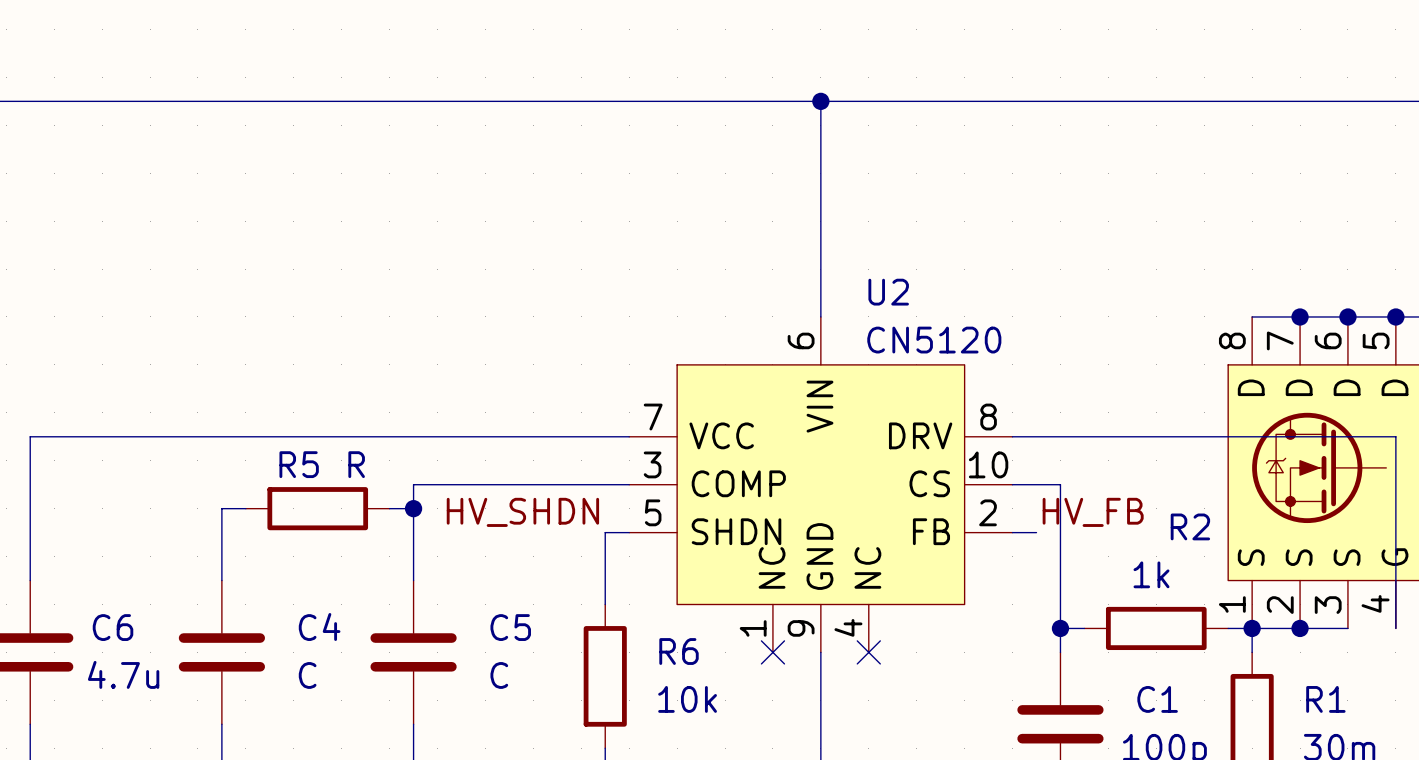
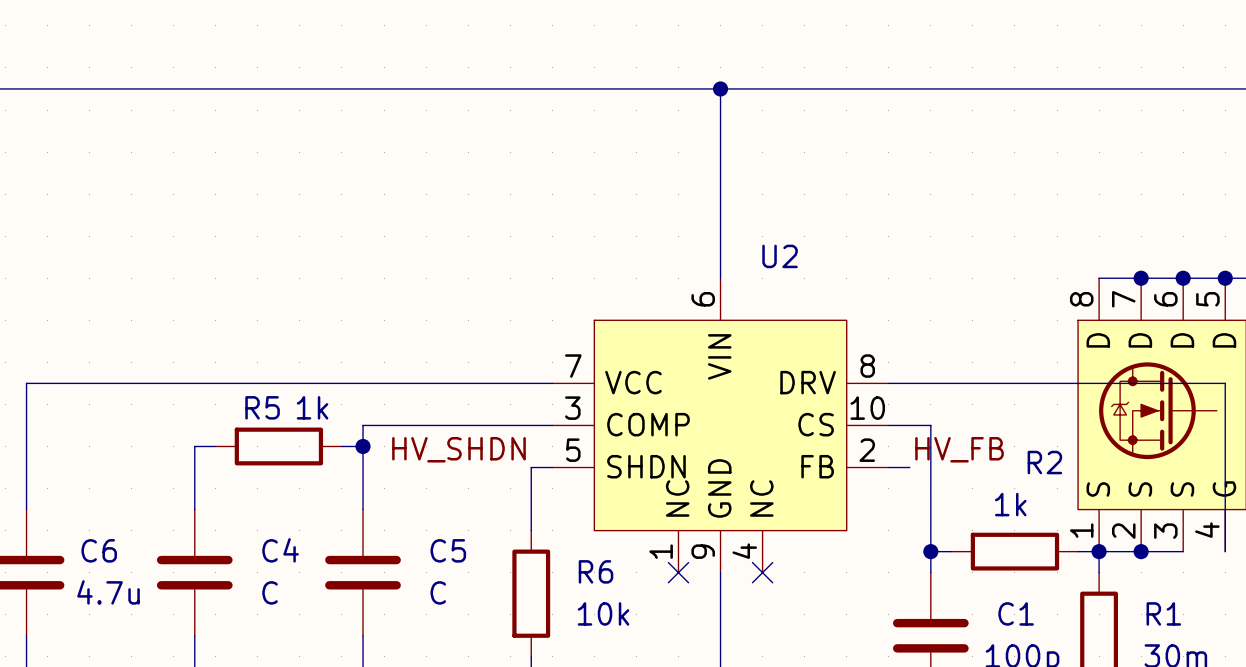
U2 value: CN5120 (934, 340) -> none
R5 value: R (356, 464) -> 1k (312, 407)

